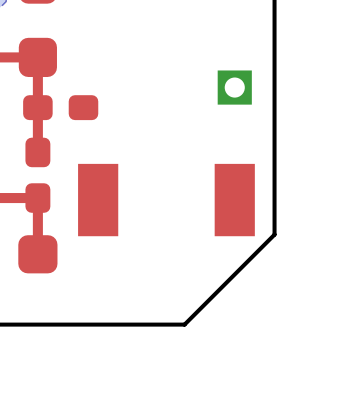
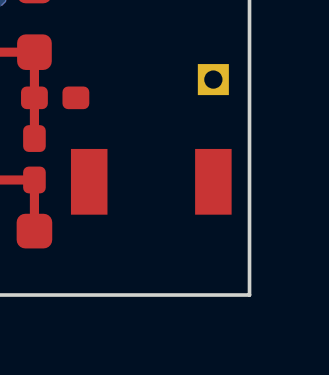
board edge: (274, 234) (184, 324) -> (249, 213) (249, 295) (167, 295)

